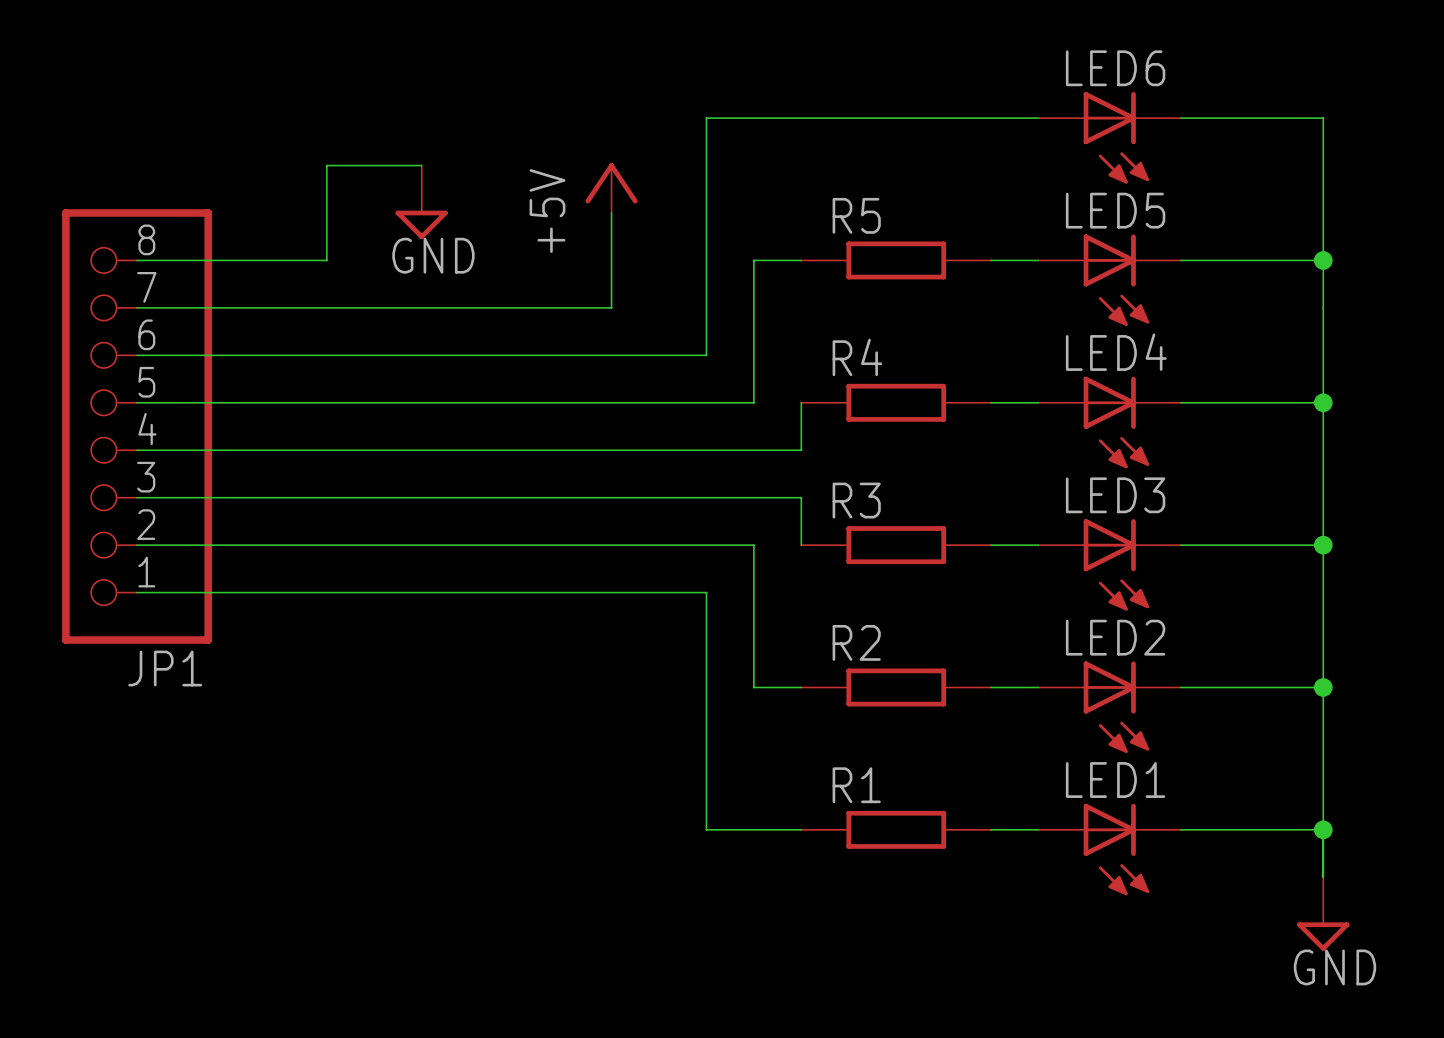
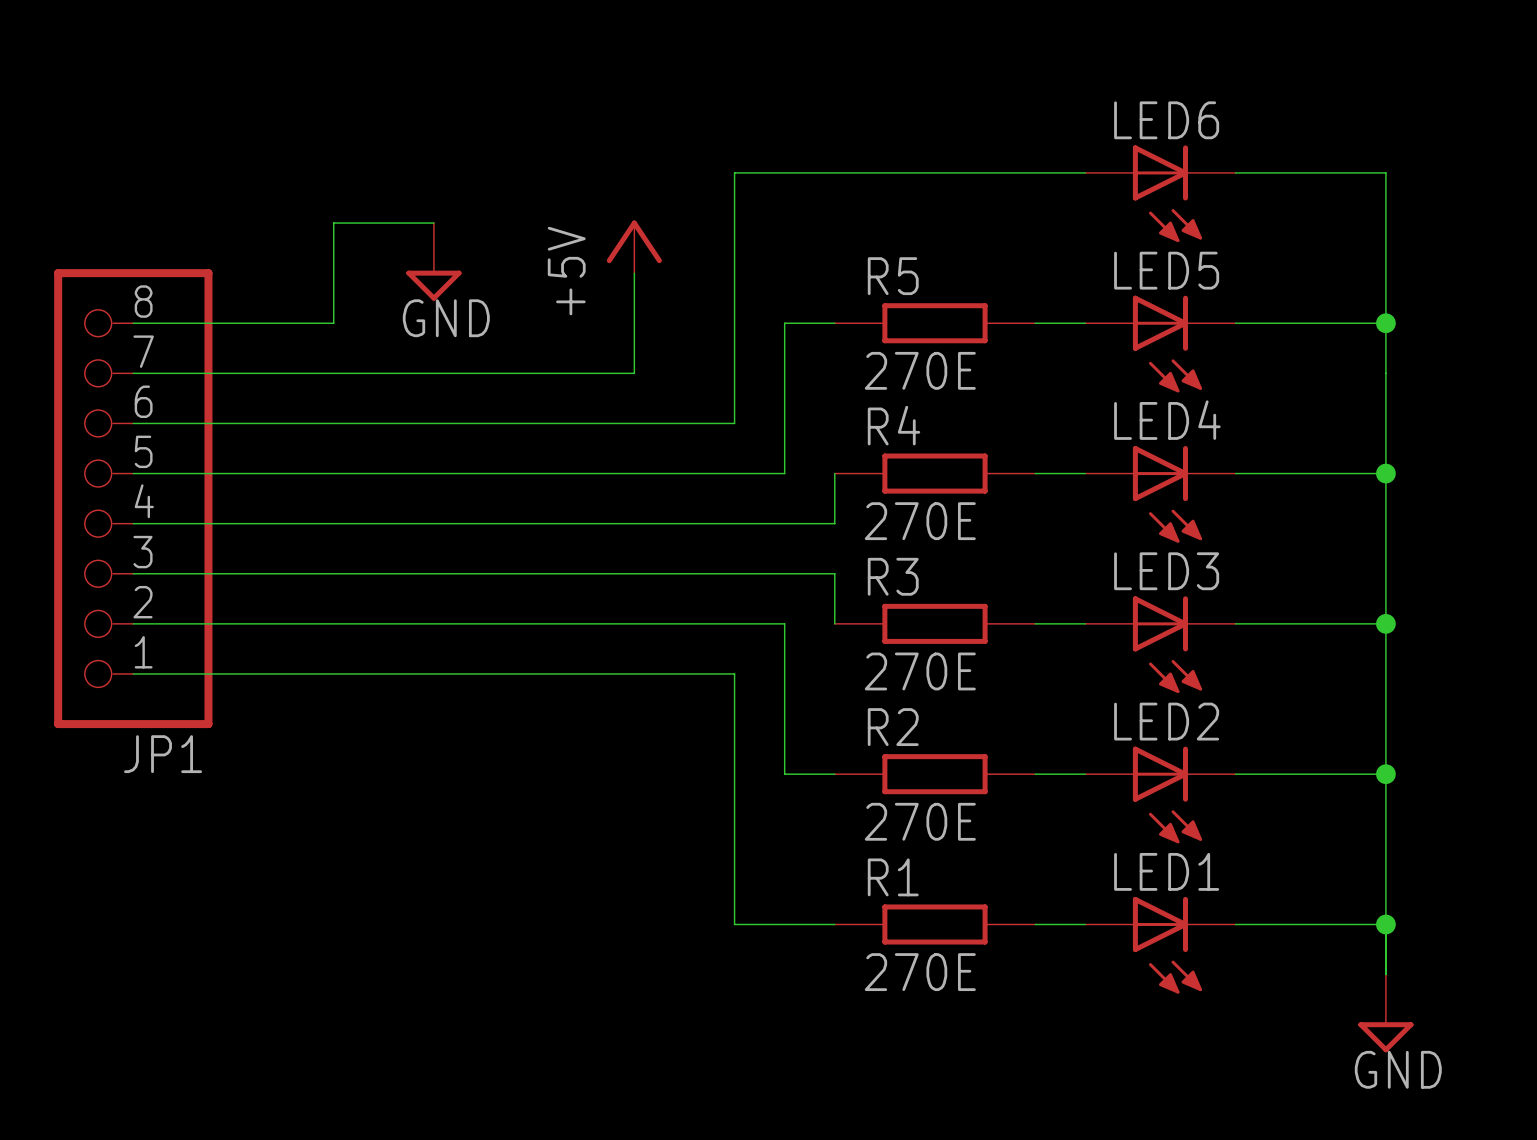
R5 value: none -> 270E (920, 370)
R4 value: none -> 270E (920, 521)
R3 value: none -> 270E (920, 671)
R2 value: none -> 270E (920, 821)
R1 value: none -> 270E (920, 972)

